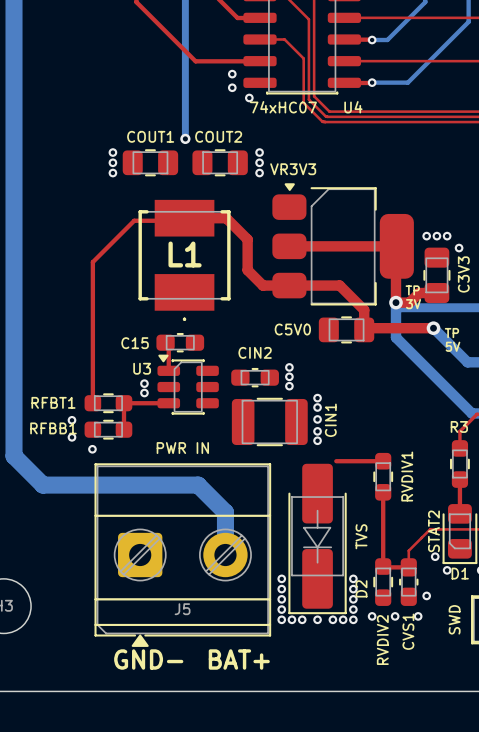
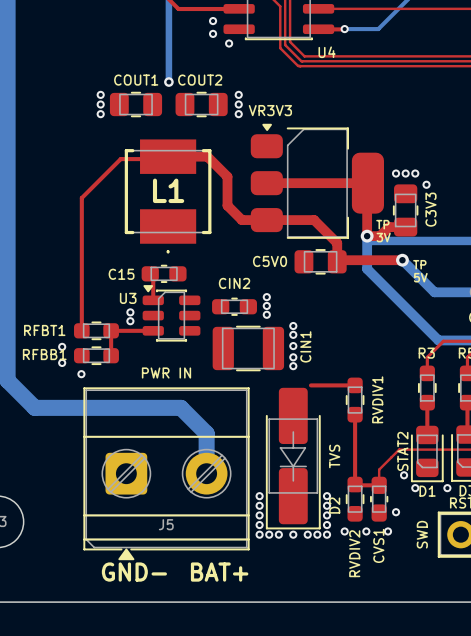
U4 value: 74xHC07 (283, 107) -> none

